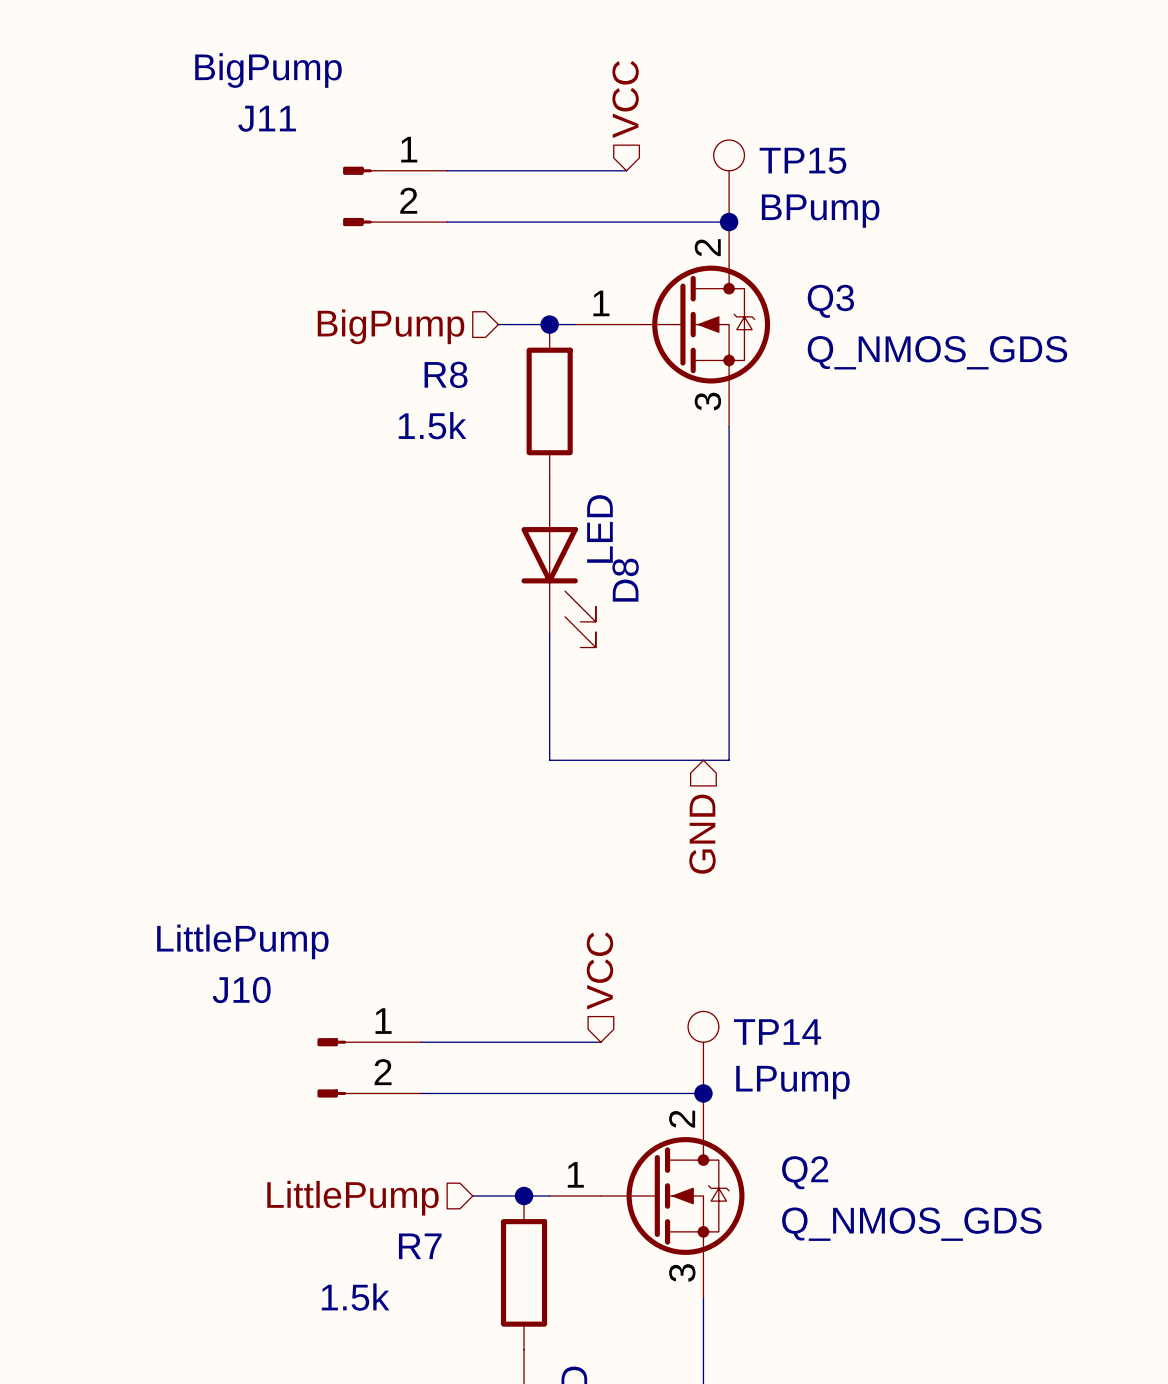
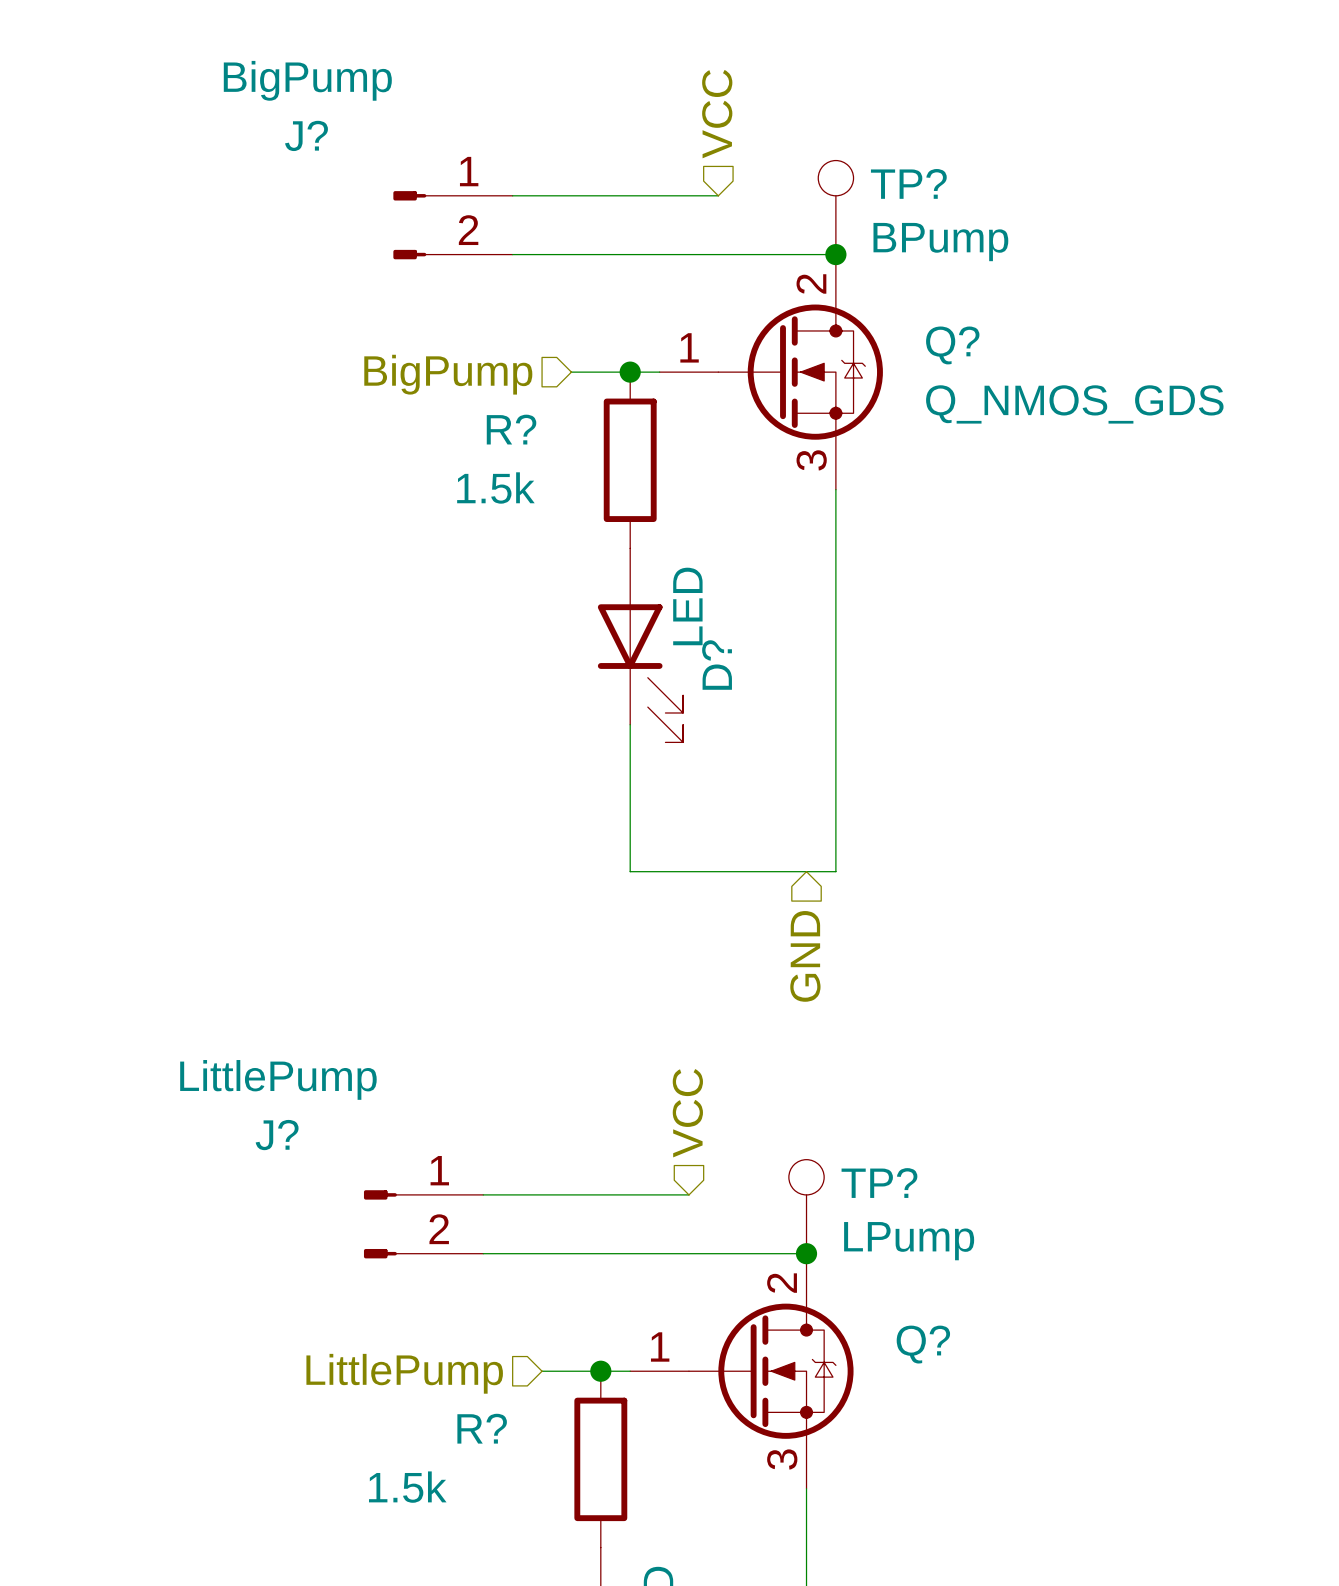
J11 name: J11 (267, 118) -> J? (306, 135)
TP15 name: TP15 (802, 160) -> TP? (908, 183)
Q3 name: Q3 (830, 301) -> Q? (952, 345)
R8 name: R8 (446, 374) -> R? (511, 429)
D8 name: D8 (625, 580) -> D? (717, 665)
J10 name: J10 (241, 989) -> J? (277, 1135)
TP14 name: TP14 (777, 1032) -> TP? (879, 1183)
Q2 name: Q2 (805, 1172) -> Q? (923, 1344)
Q2 value: Q_NMOS_GDS (911, 1224) -> none
R7 name: R7 (420, 1246) -> R? (482, 1428)

